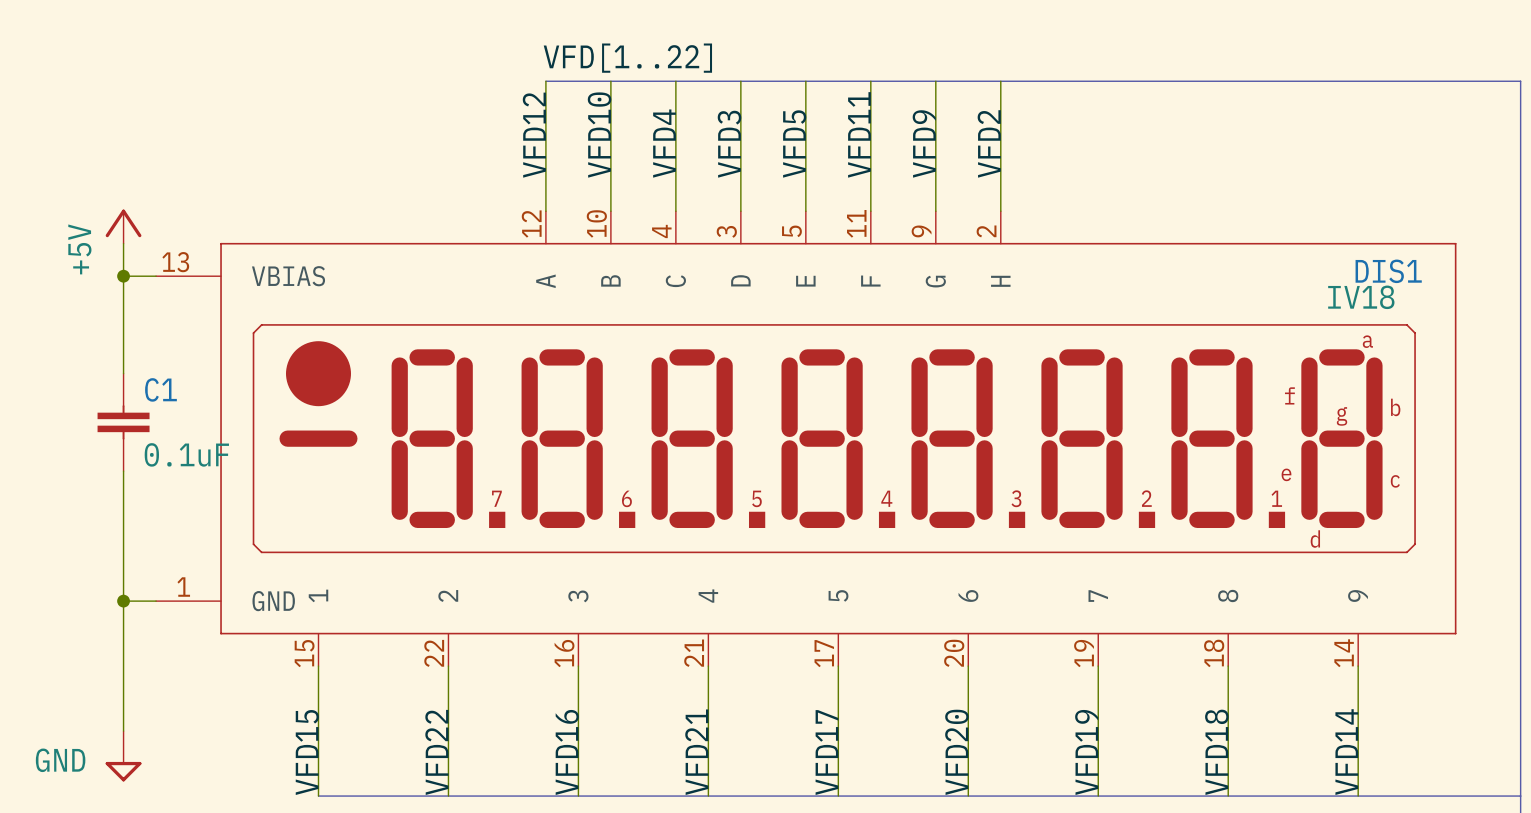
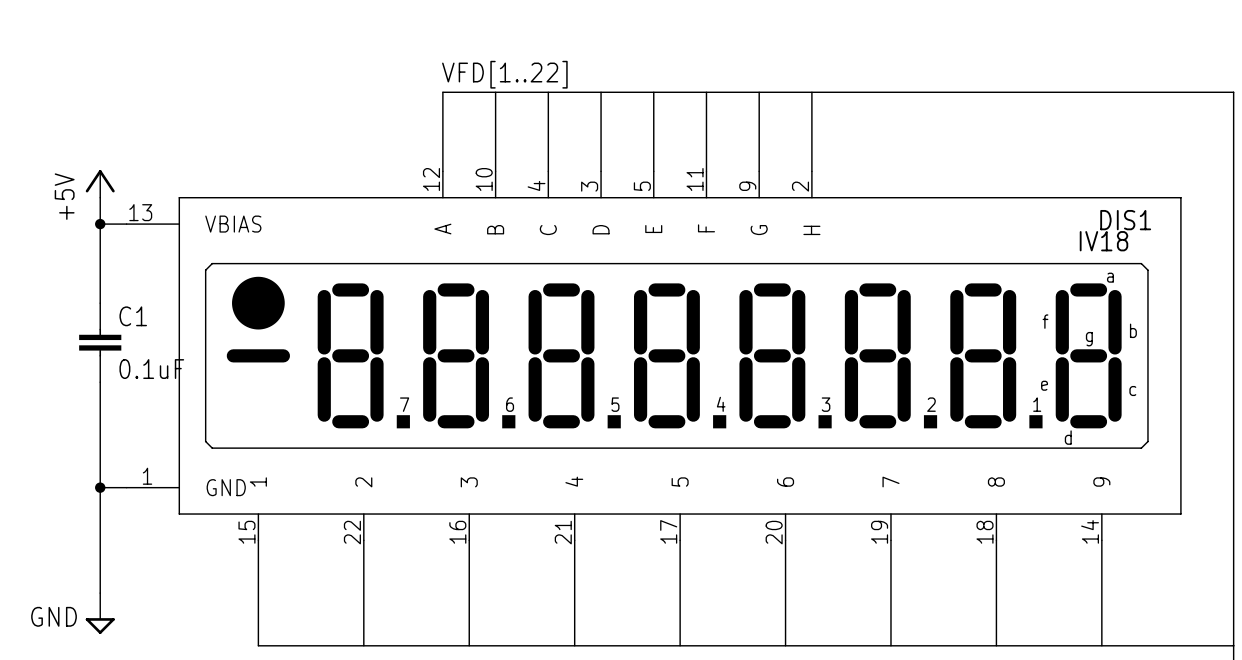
label position: VFD[1..22] (627, 58) -> VFD[1..22] (504, 74)
bus: (545, 81) (1520, 81) (1520, 113) -> (442, 92) (1233, 92)
wire: (545, 81) (545, 113) -> none
wire: (610, 81) (610, 113) -> none
wire: (675, 81) (675, 113) -> none
wire: (740, 81) (740, 113) -> none
wire: (805, 81) (805, 113) -> none
wire: (870, 81) (870, 113) -> none
wire: (935, 81) (935, 113) -> none
wire: (1000, 81) (1000, 113) -> none
label: VFD11 (859, 134) -> none
label: VFD12 (534, 135) -> none
label: VFD10 (599, 135) -> none
label: VFD4 (664, 143) -> none
label: VFD5 (794, 143) -> none
label: VFD9 (924, 143) -> none
label: VFD2 (989, 143) -> none
label: VFD3 (729, 144) -> none
label: VFD15 (307, 752) -> none
label: VFD22 (436, 752) -> none
label: VFD16 (567, 752) -> none
label: VFD21 (696, 752) -> none
label: VFD17 (826, 752) -> none
label: VFD20 (956, 752) -> none
label: VFD19 (1086, 752) -> none
label: VFD18 (1216, 752) -> none
label: VFD14 (1346, 752) -> none

